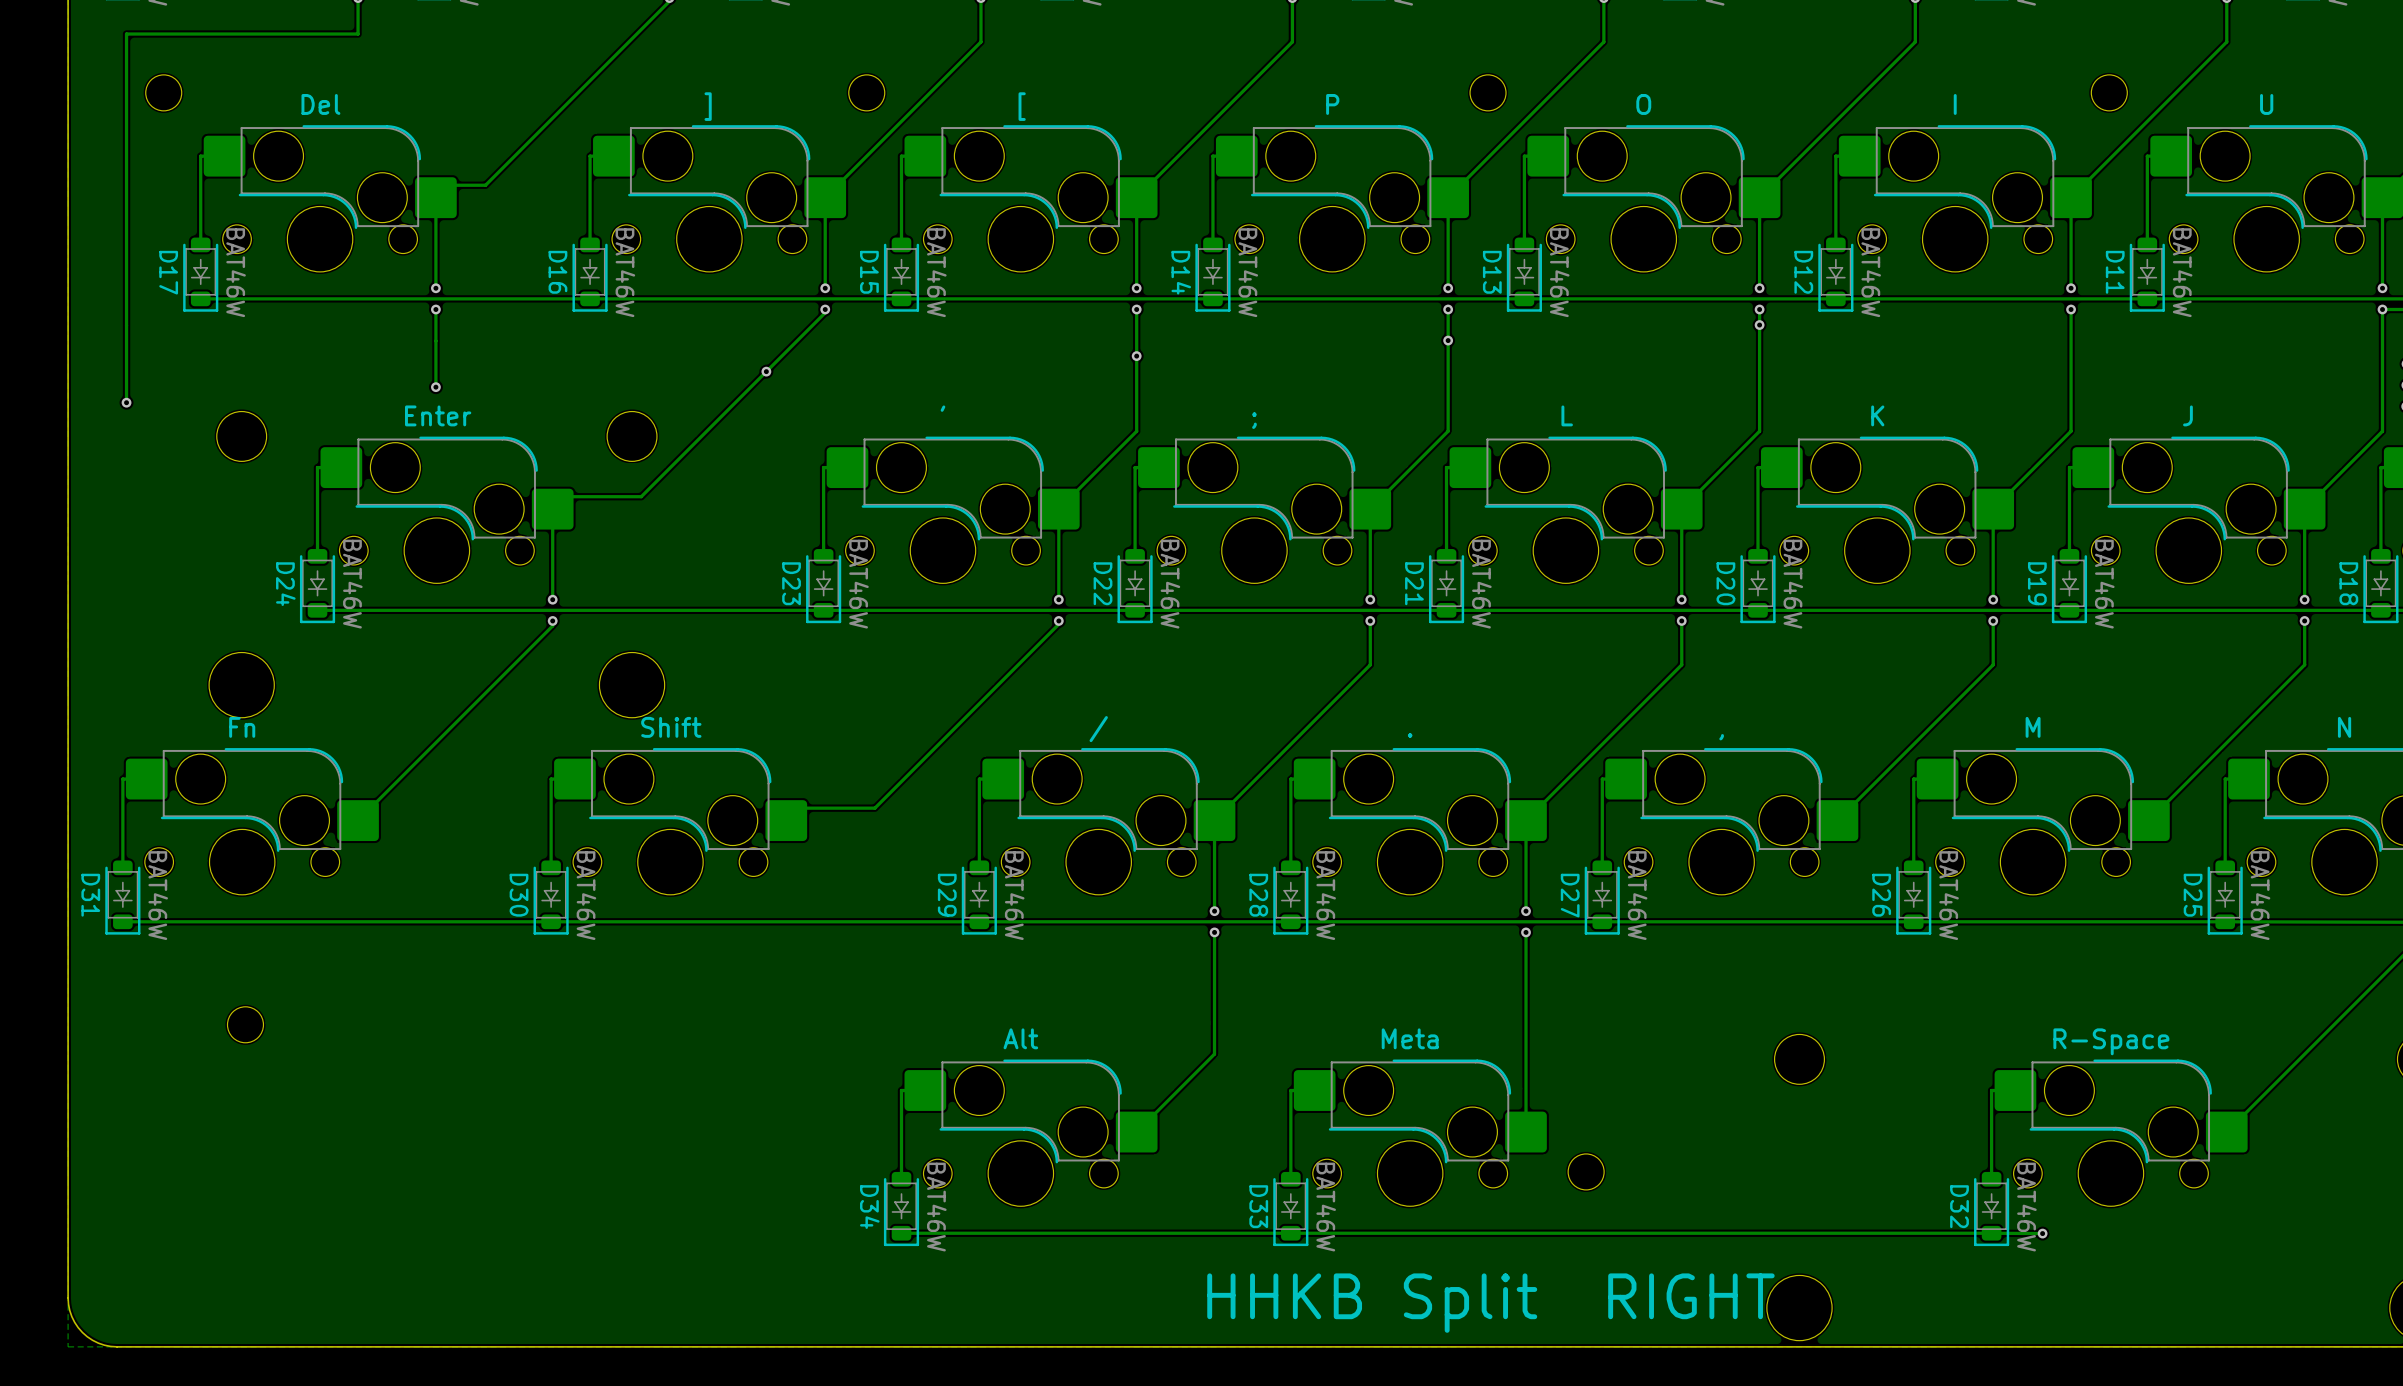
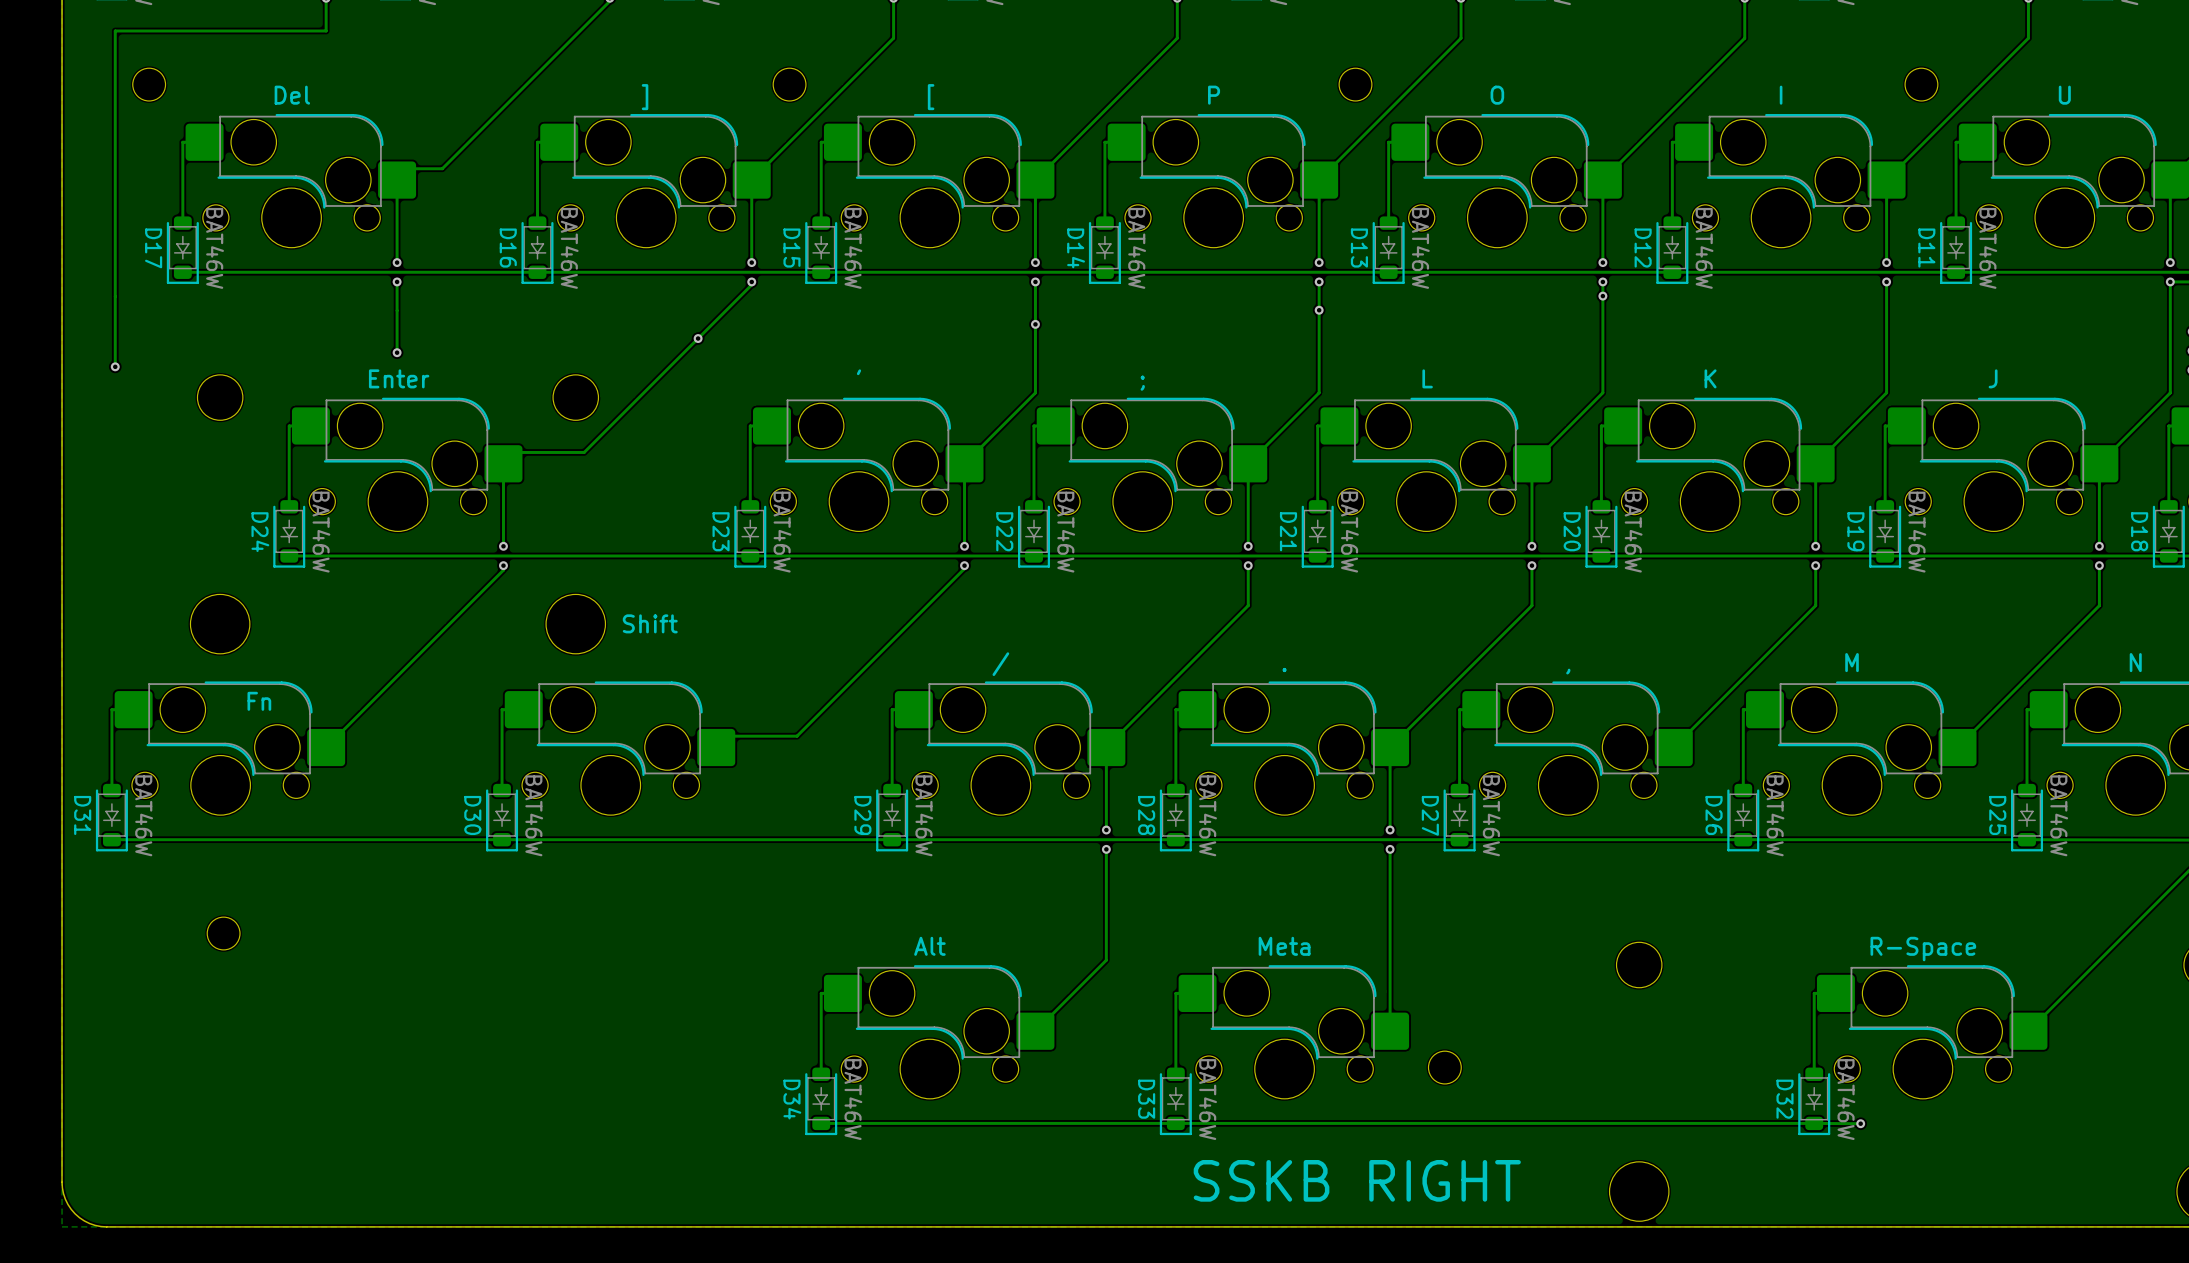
text position: Fn (242, 727) -> Fn (259, 701)
text position: Shift (671, 727) -> Shift (650, 623)
text: HHKB Split RIGHT (1490, 1303) -> SSKB RIGHT (1357, 1180)

